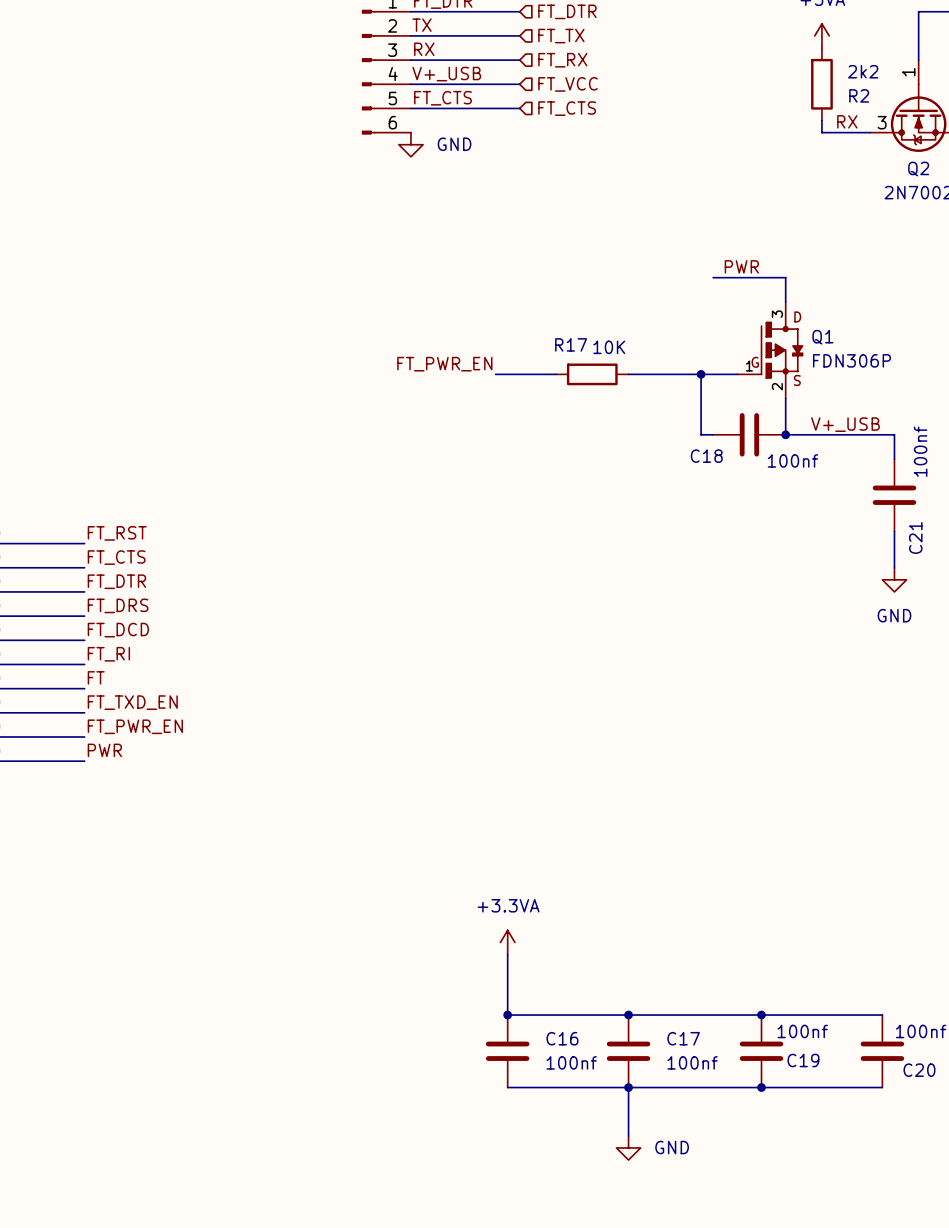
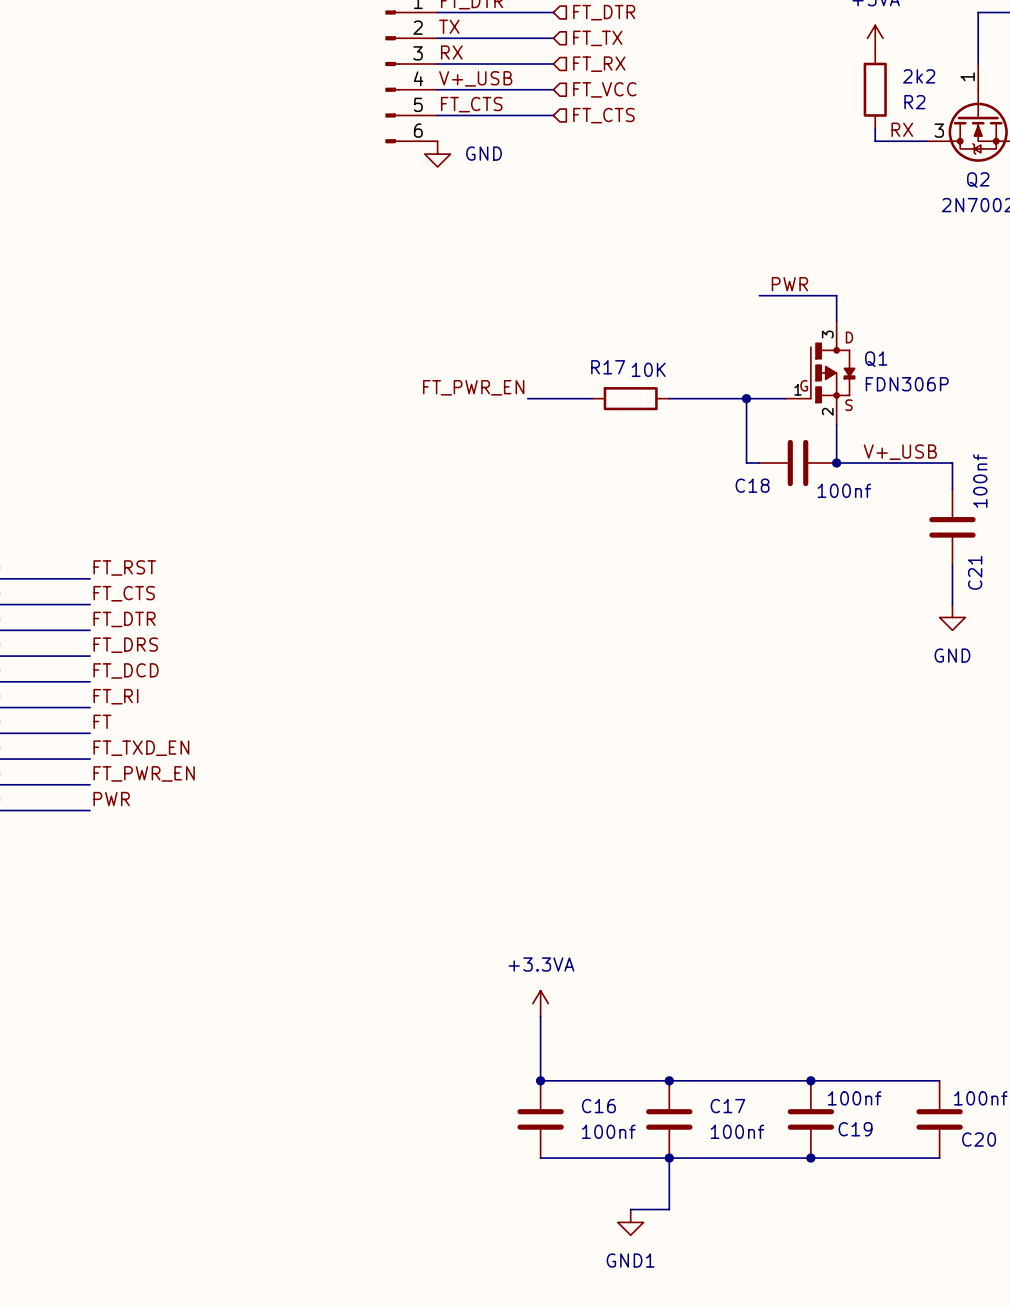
wire: none -> (630, 1209) (669, 1209)
power symbol: none -> GND1 (630, 1222)
power symbol: GND (628, 1147) -> none

